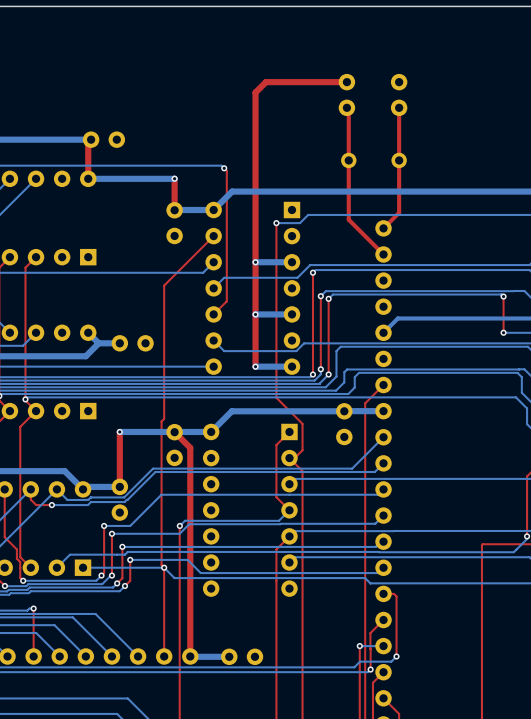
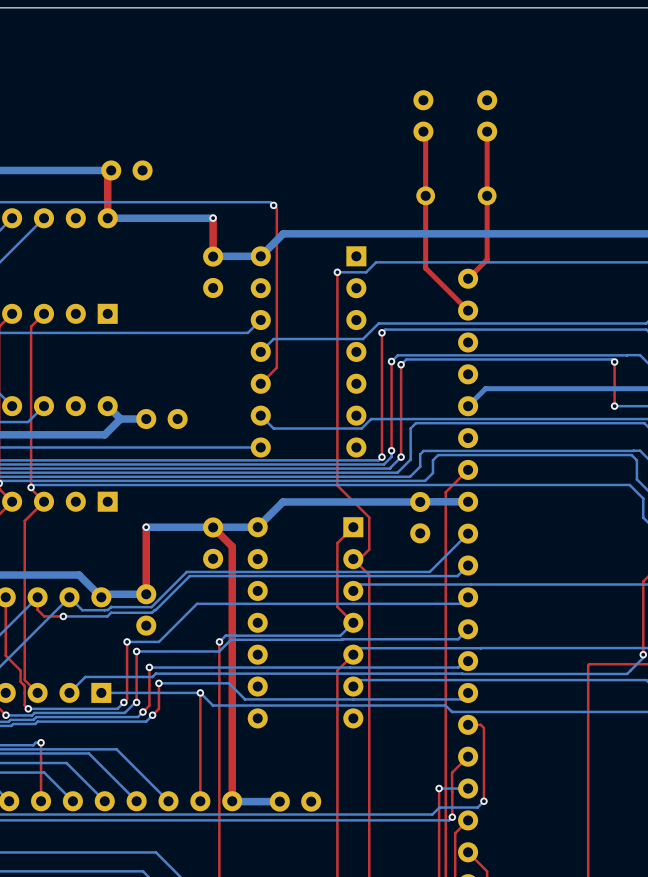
top track: (346, 82) (265, 82) (255, 92) (255, 366) -> none
top track: (213, 236) (164, 285) (164, 418) (161, 421) (161, 565) (164, 567) -> none
via: (255, 262) -> none
bottom track: (291, 262) (255, 262) -> none
via: (255, 314) -> none
bottom track: (291, 314) (255, 314) -> none
via: (255, 366) -> none
bottom track: (291, 366) (255, 366) -> none

